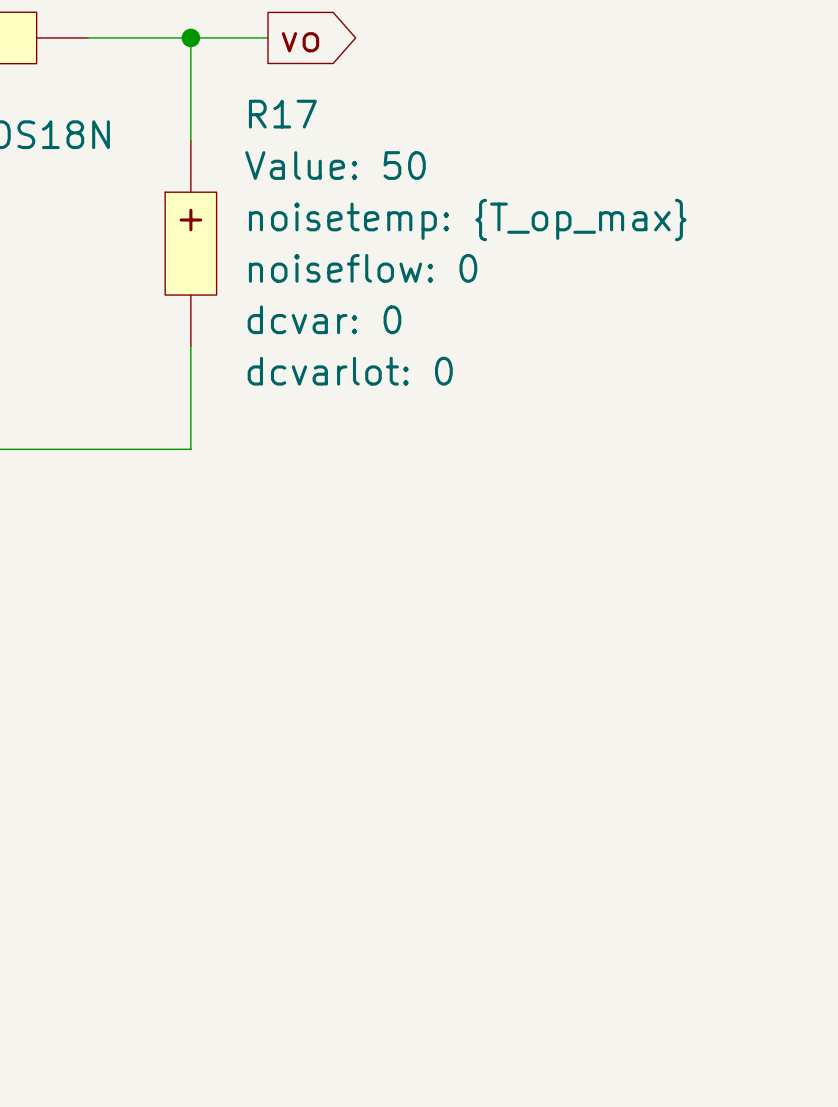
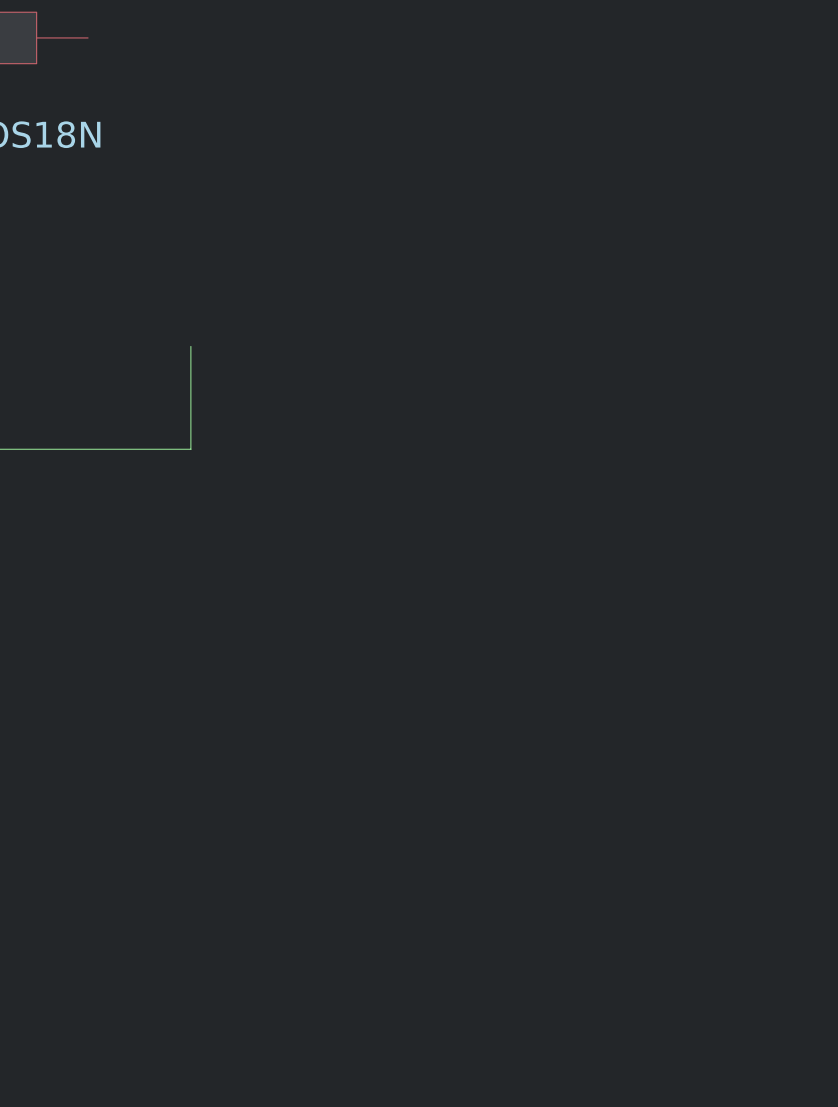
wire: (88, 37) (268, 37) -> none
wire: (190, 37) (190, 140) -> none
junction: (190, 37) -> none
global label: vo (300, 42) -> none
R17: Value: 50 (190, 243) -> none

